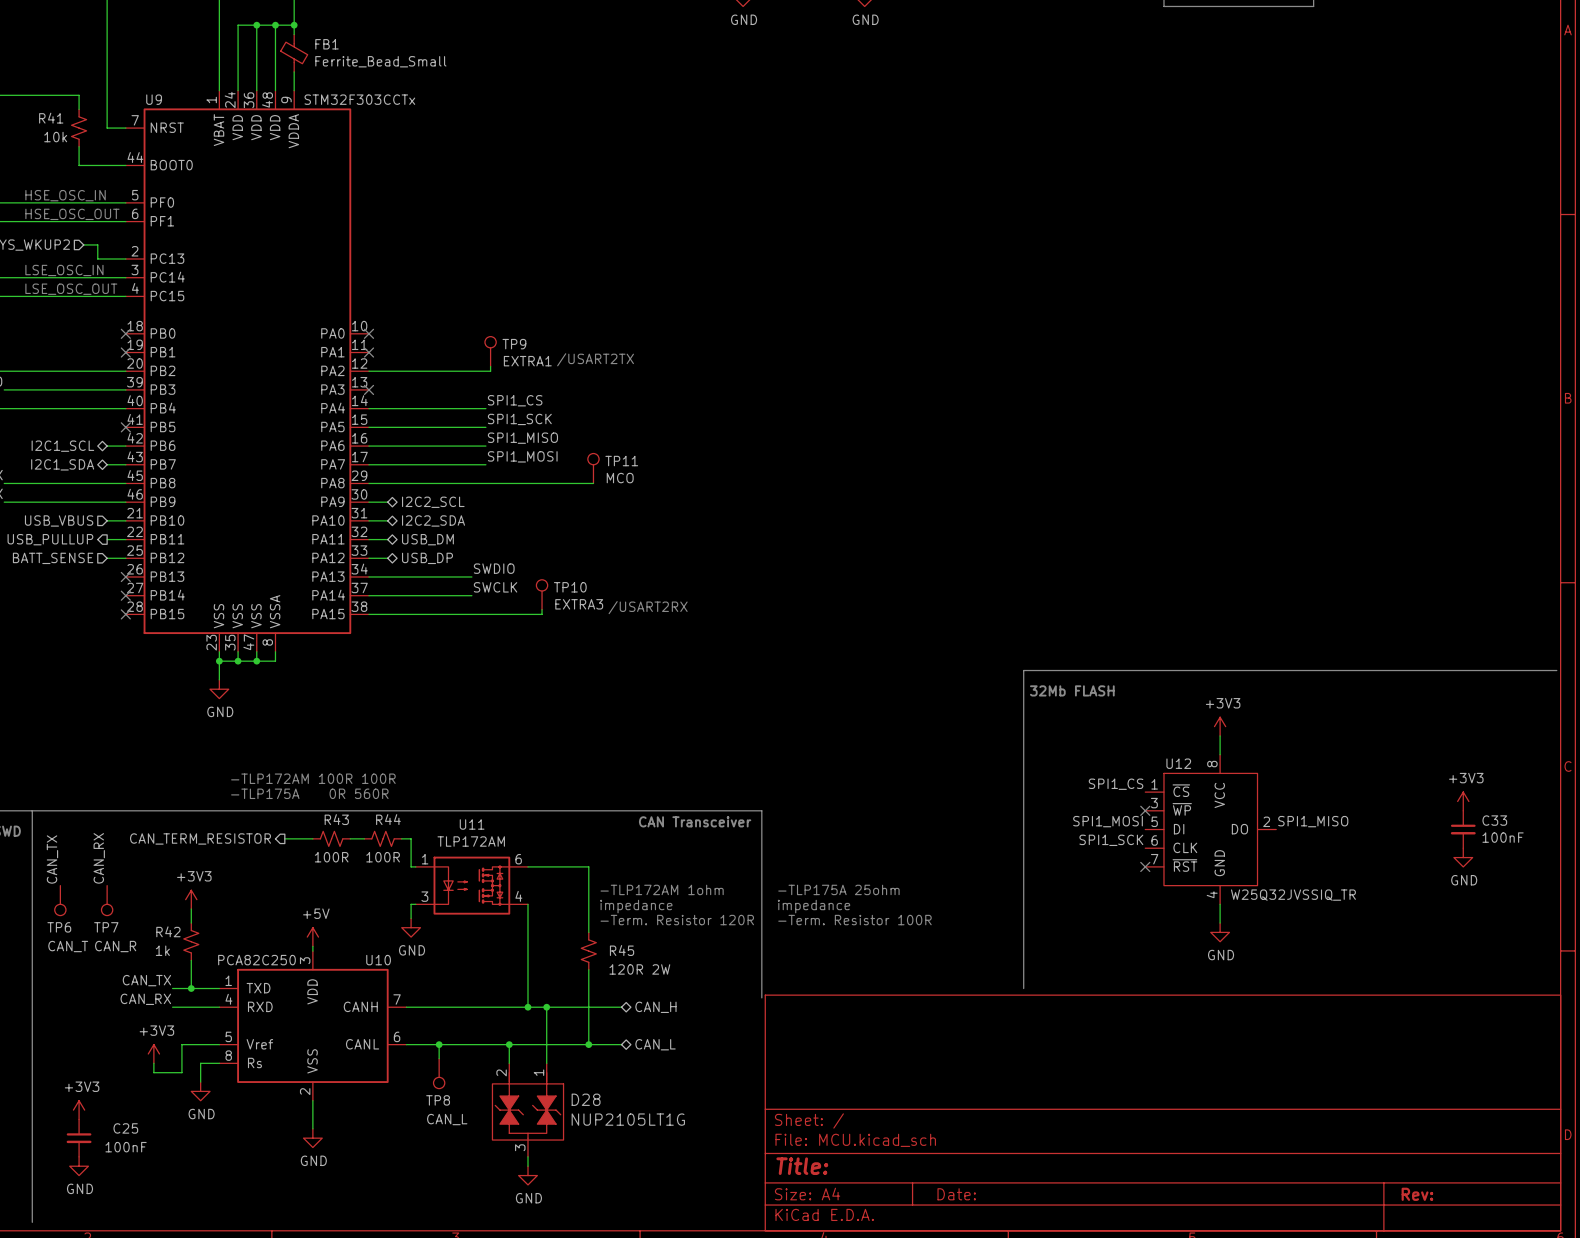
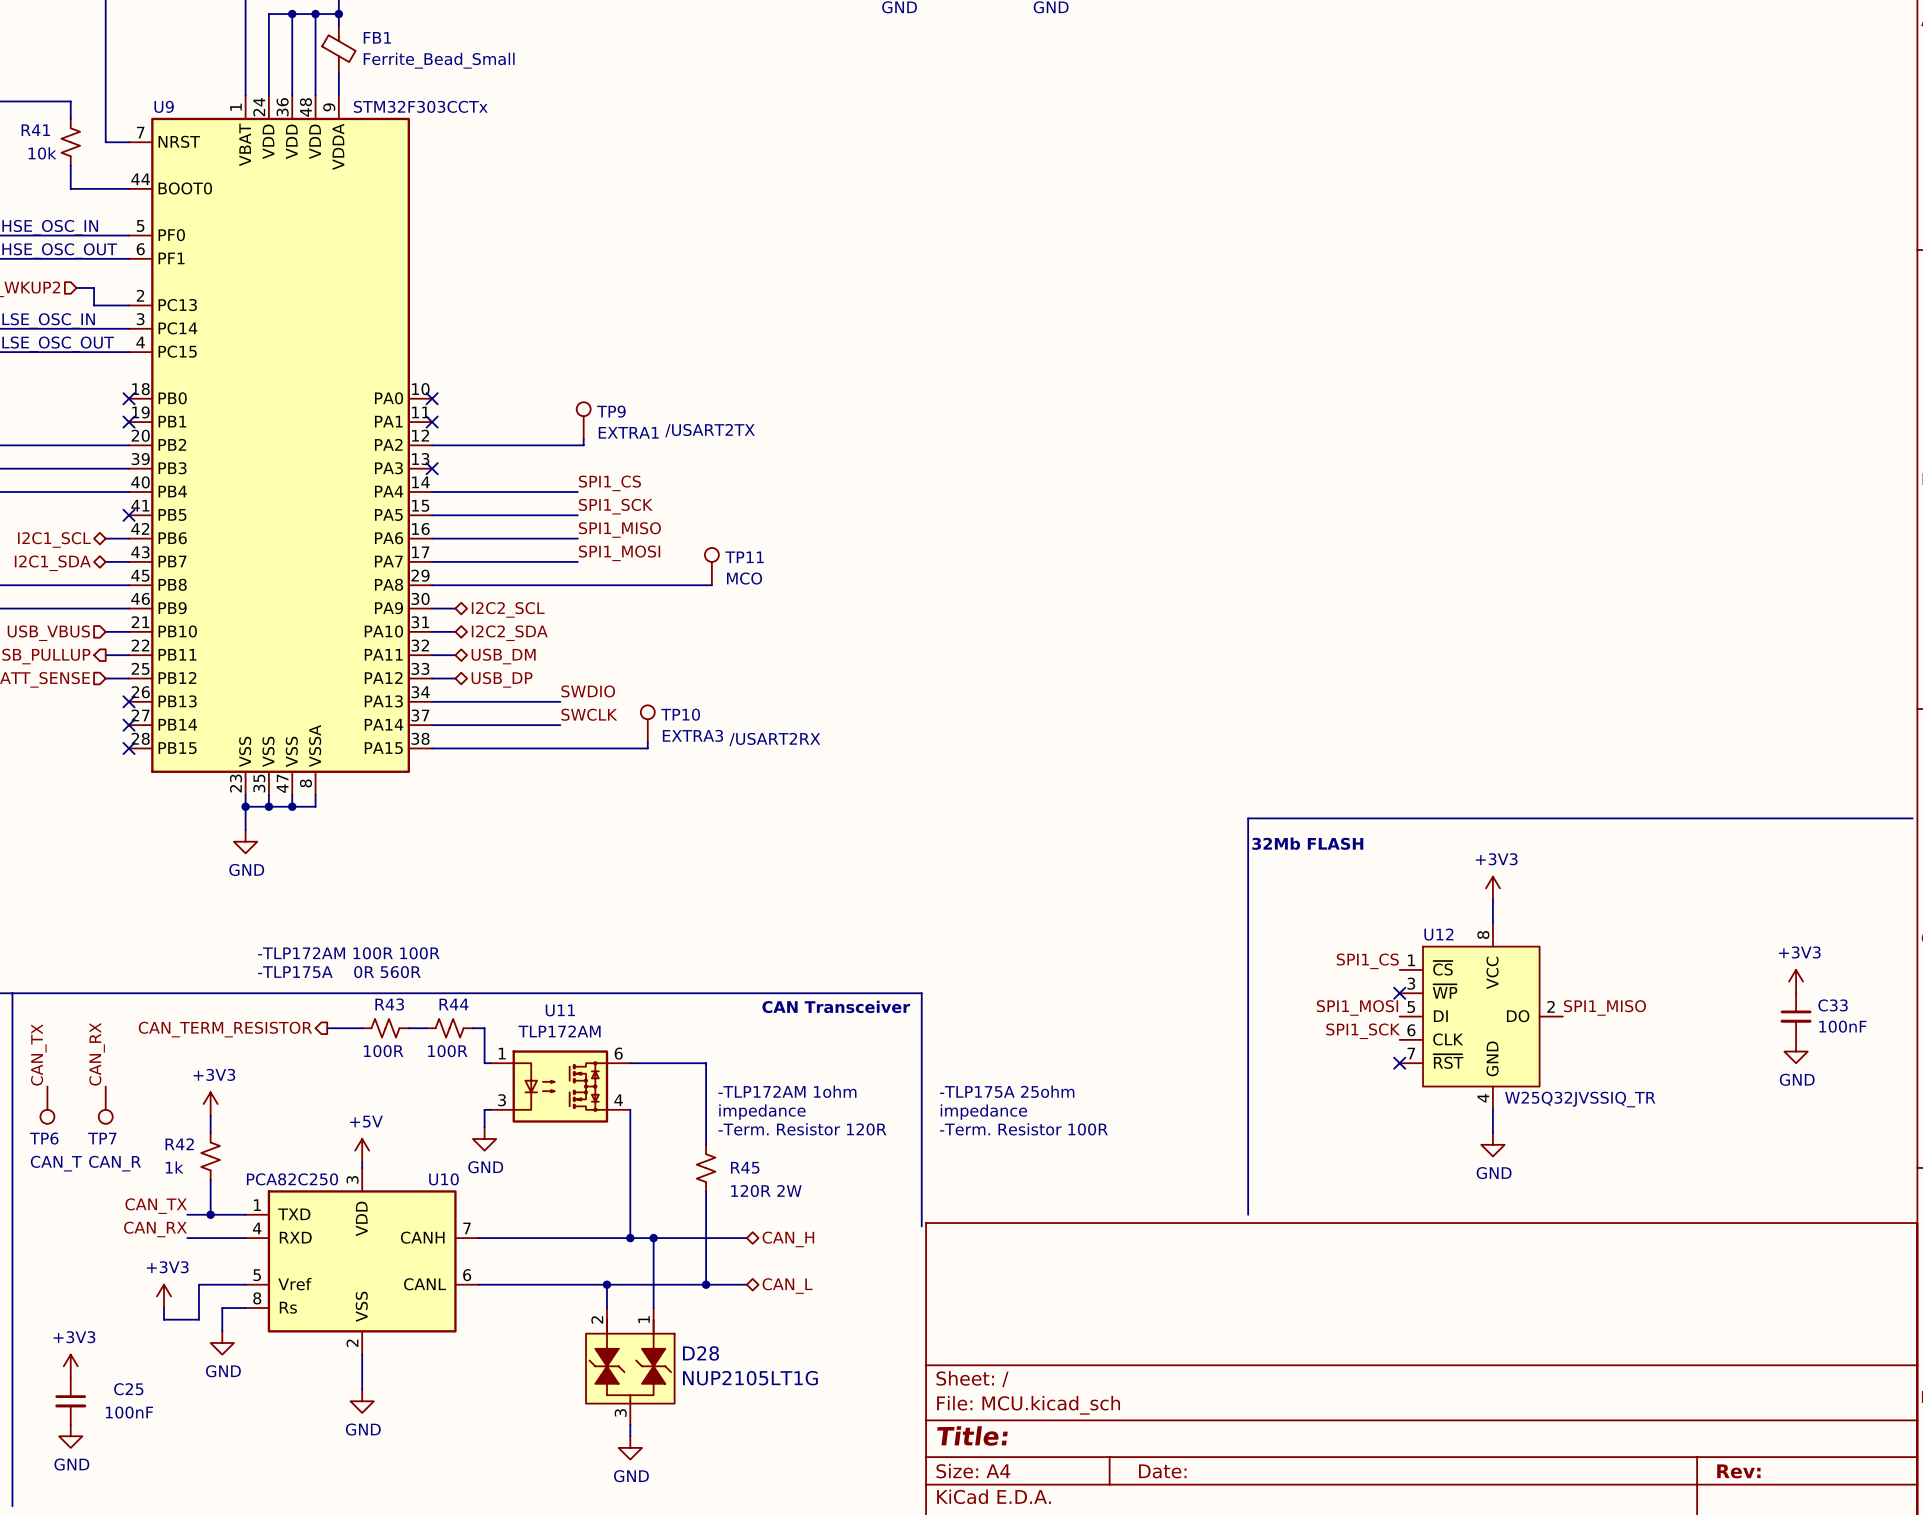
wire: (439, 1044) (439, 1058) -> none
junction: (439, 1044) -> none
TP8: CAN_L (439, 1073) -> none

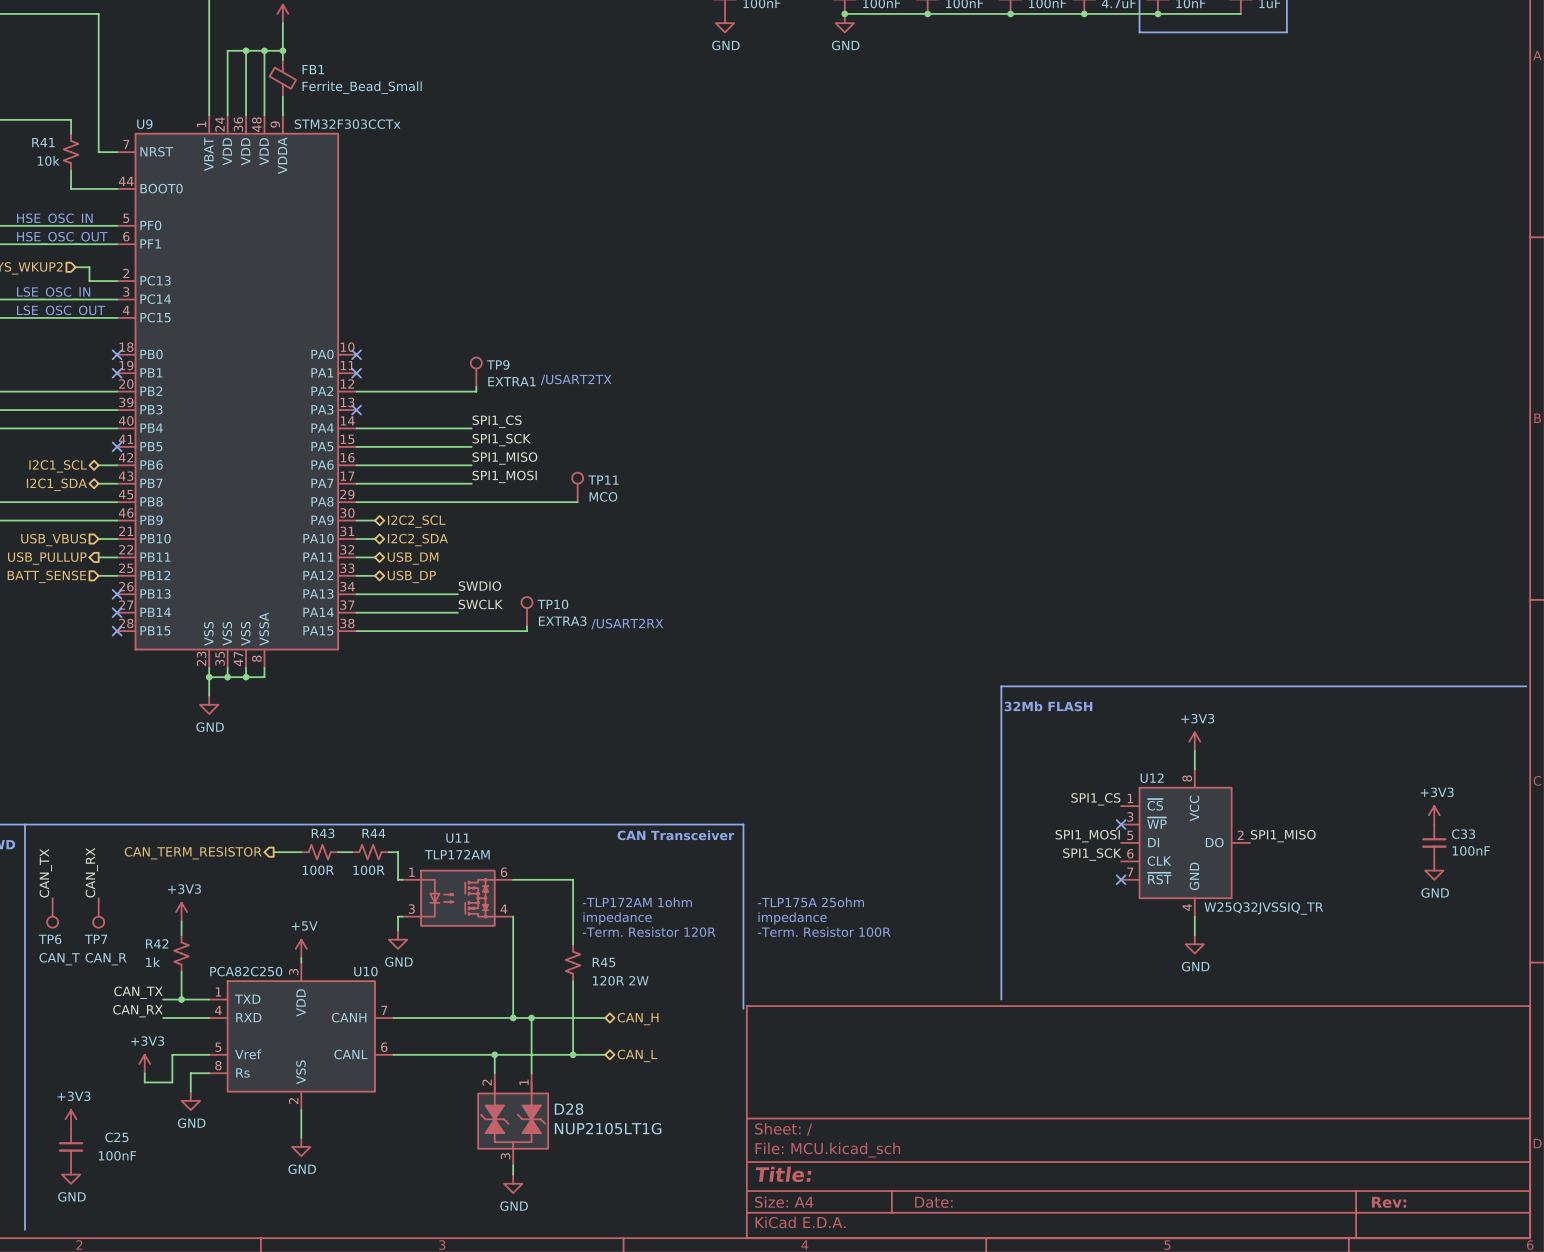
text: -TLP172AM 100R 100R (348, 953) -> none
text: -TLP175A 0R 560R (339, 972) -> none

